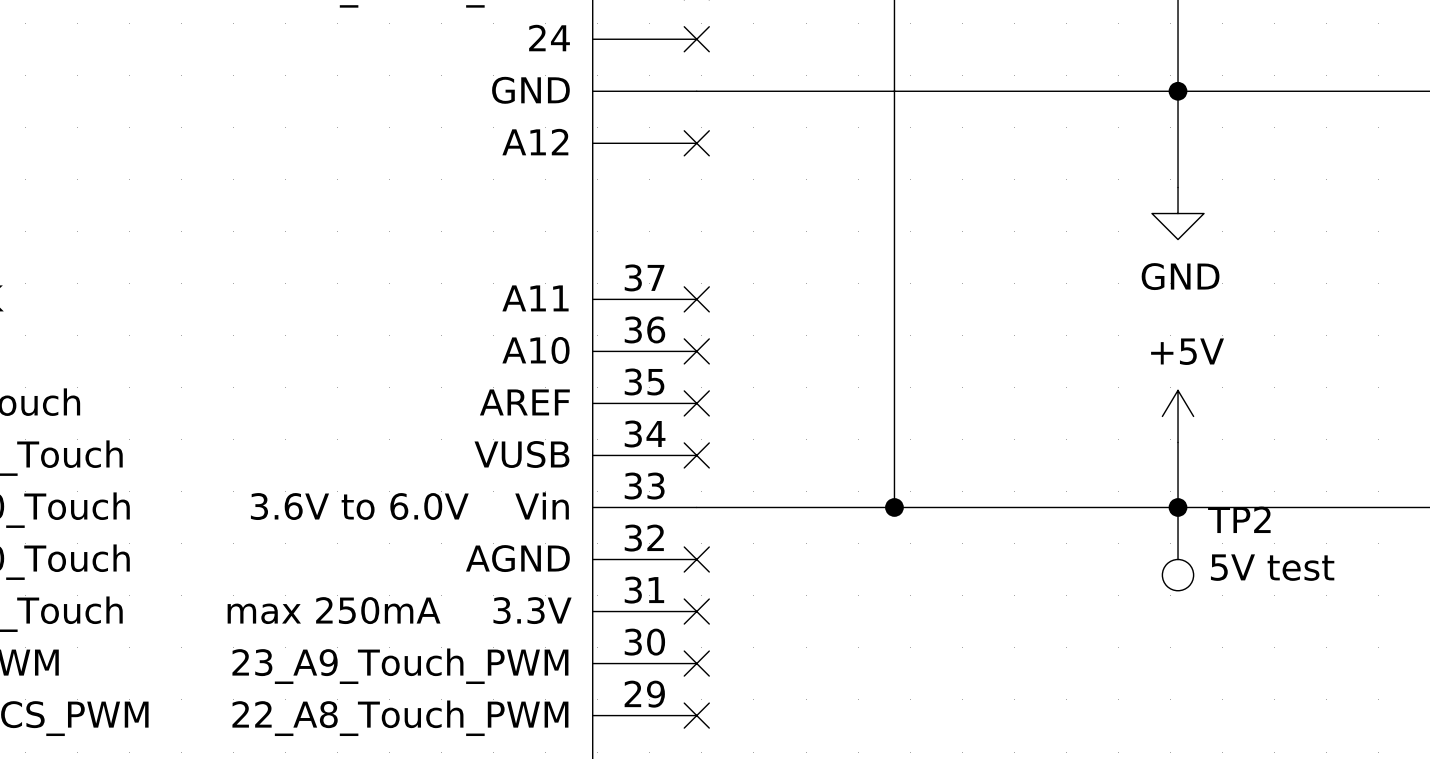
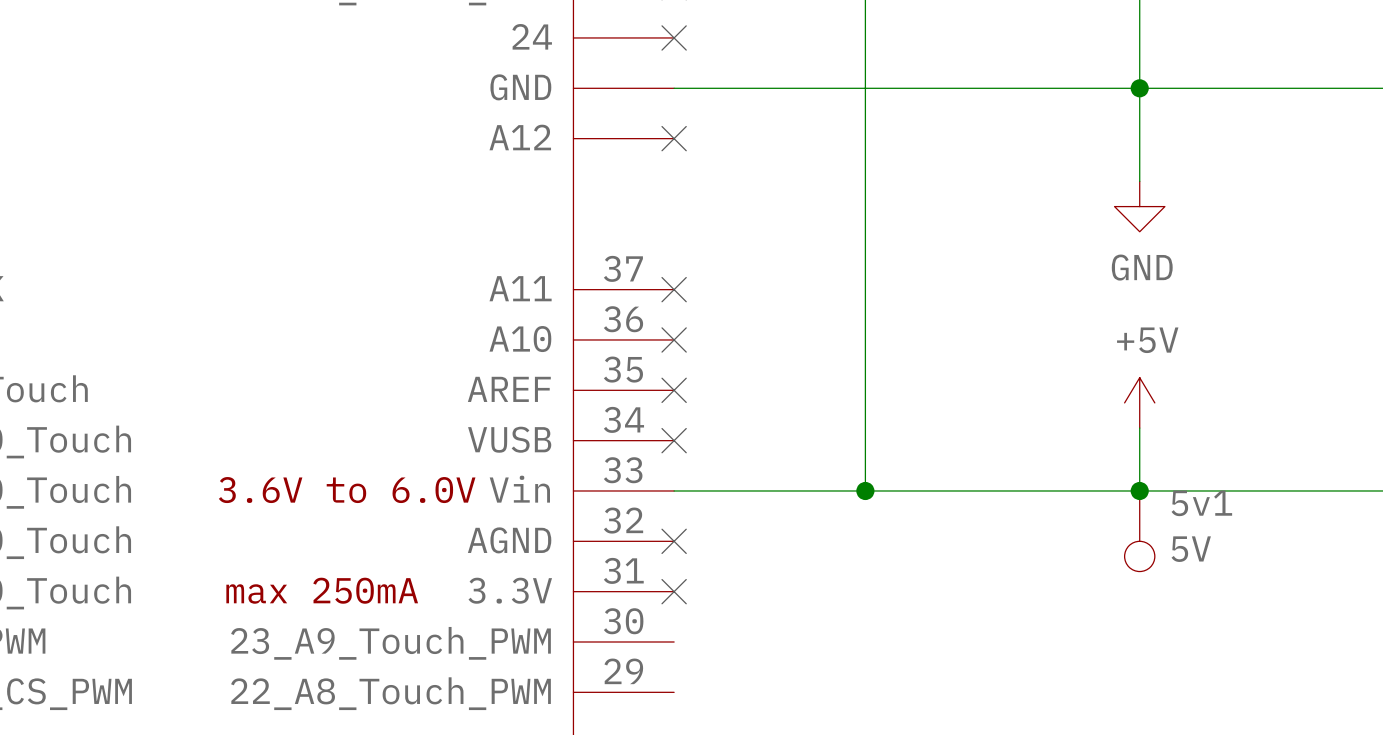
TP2 name: TP2 (1239, 519) -> 5v1 (1201, 503)
TP2 value: 5V test (1272, 567) -> 5V (1191, 549)
no-connect mark: (696, 663) -> none
no-connect mark: (696, 715) -> none

